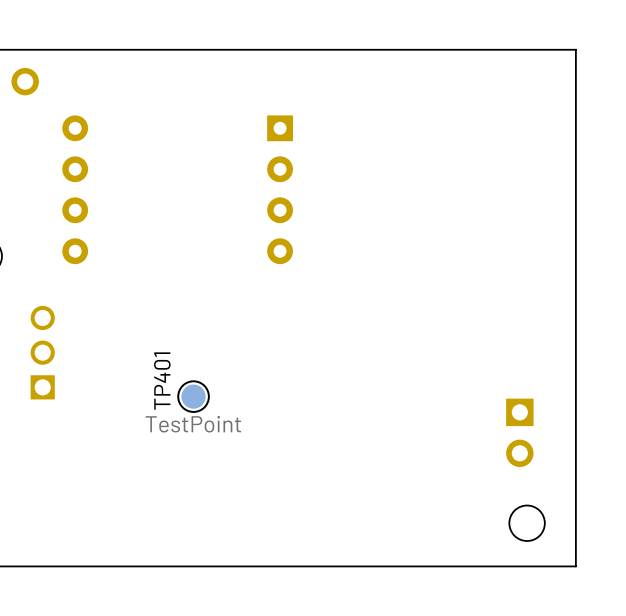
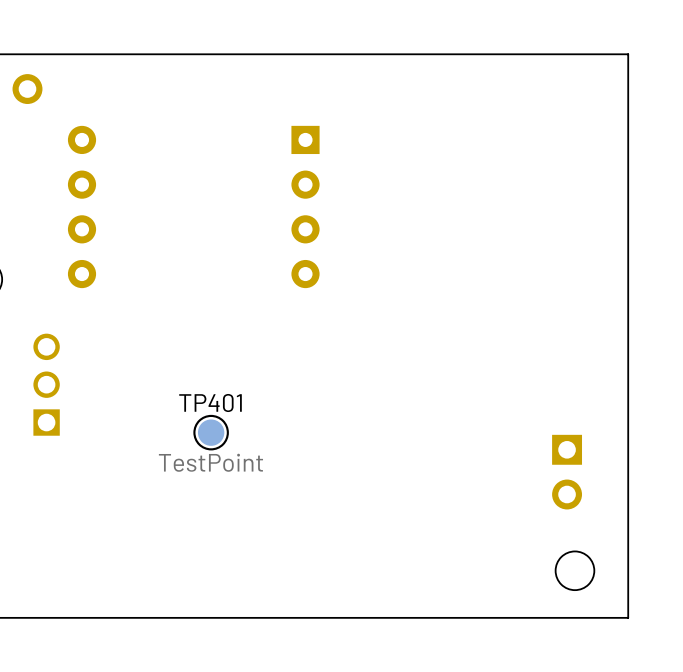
TP401 name rotation: 0° (162, 381) -> 90° clockwise (210, 403)

